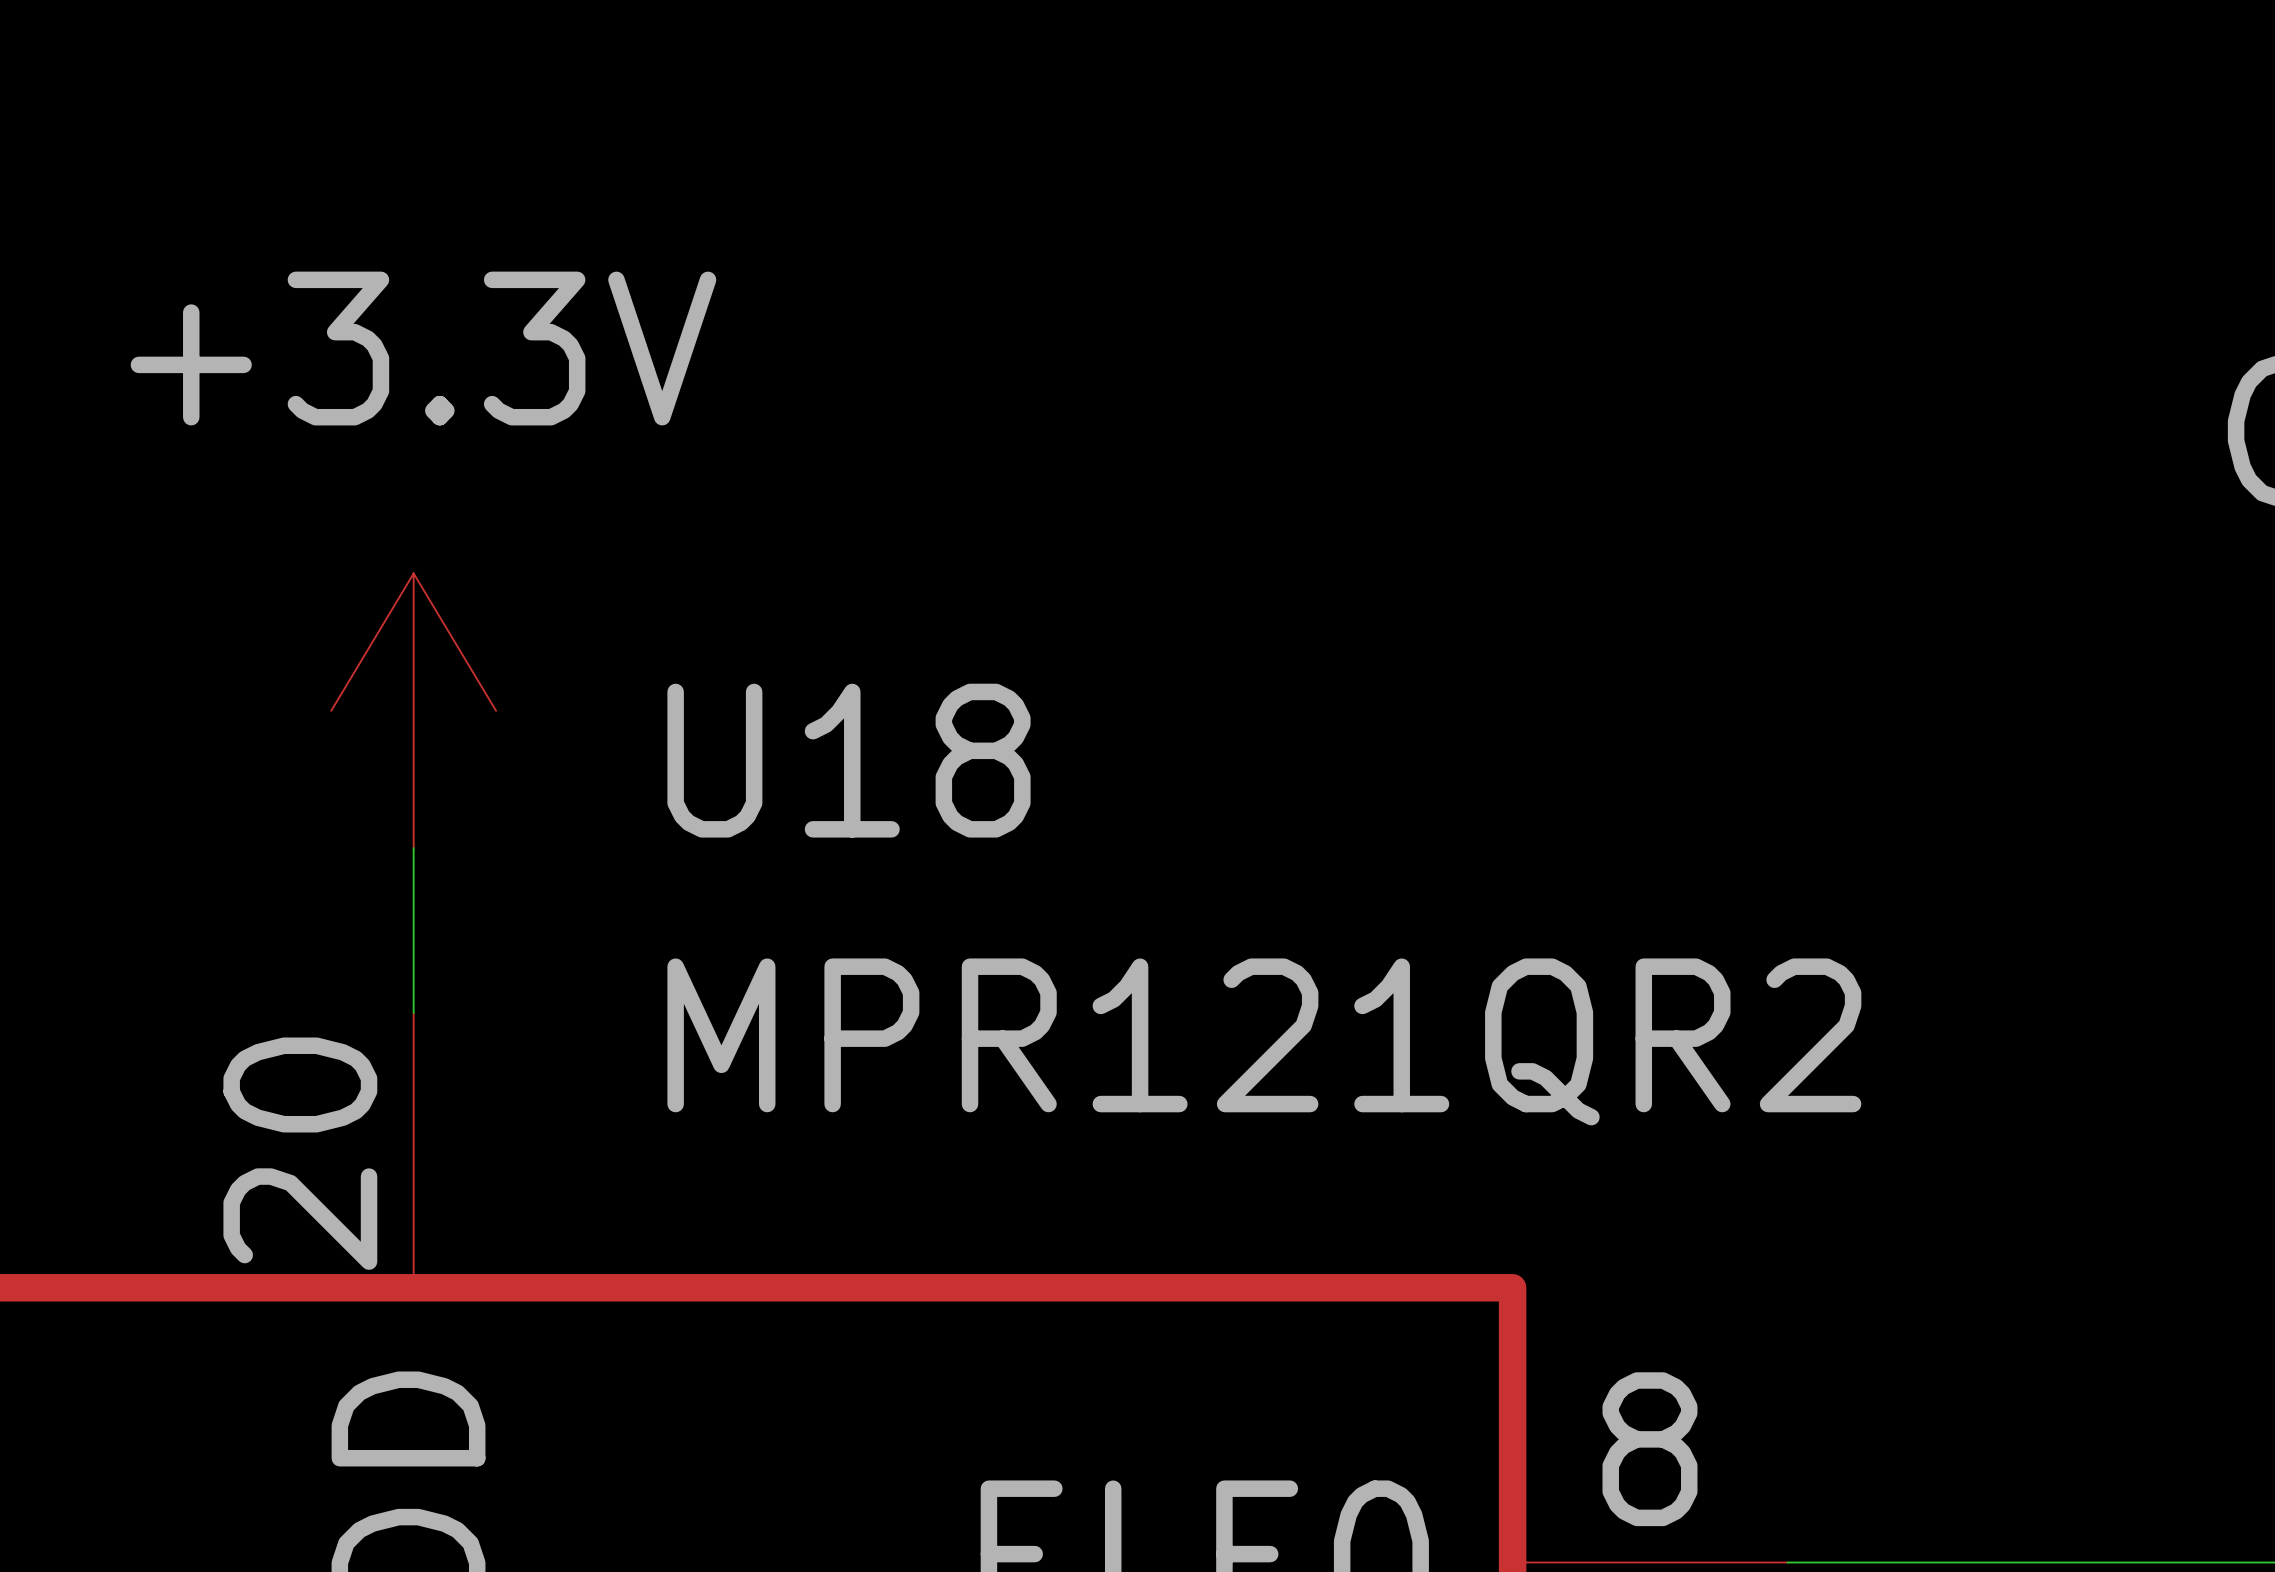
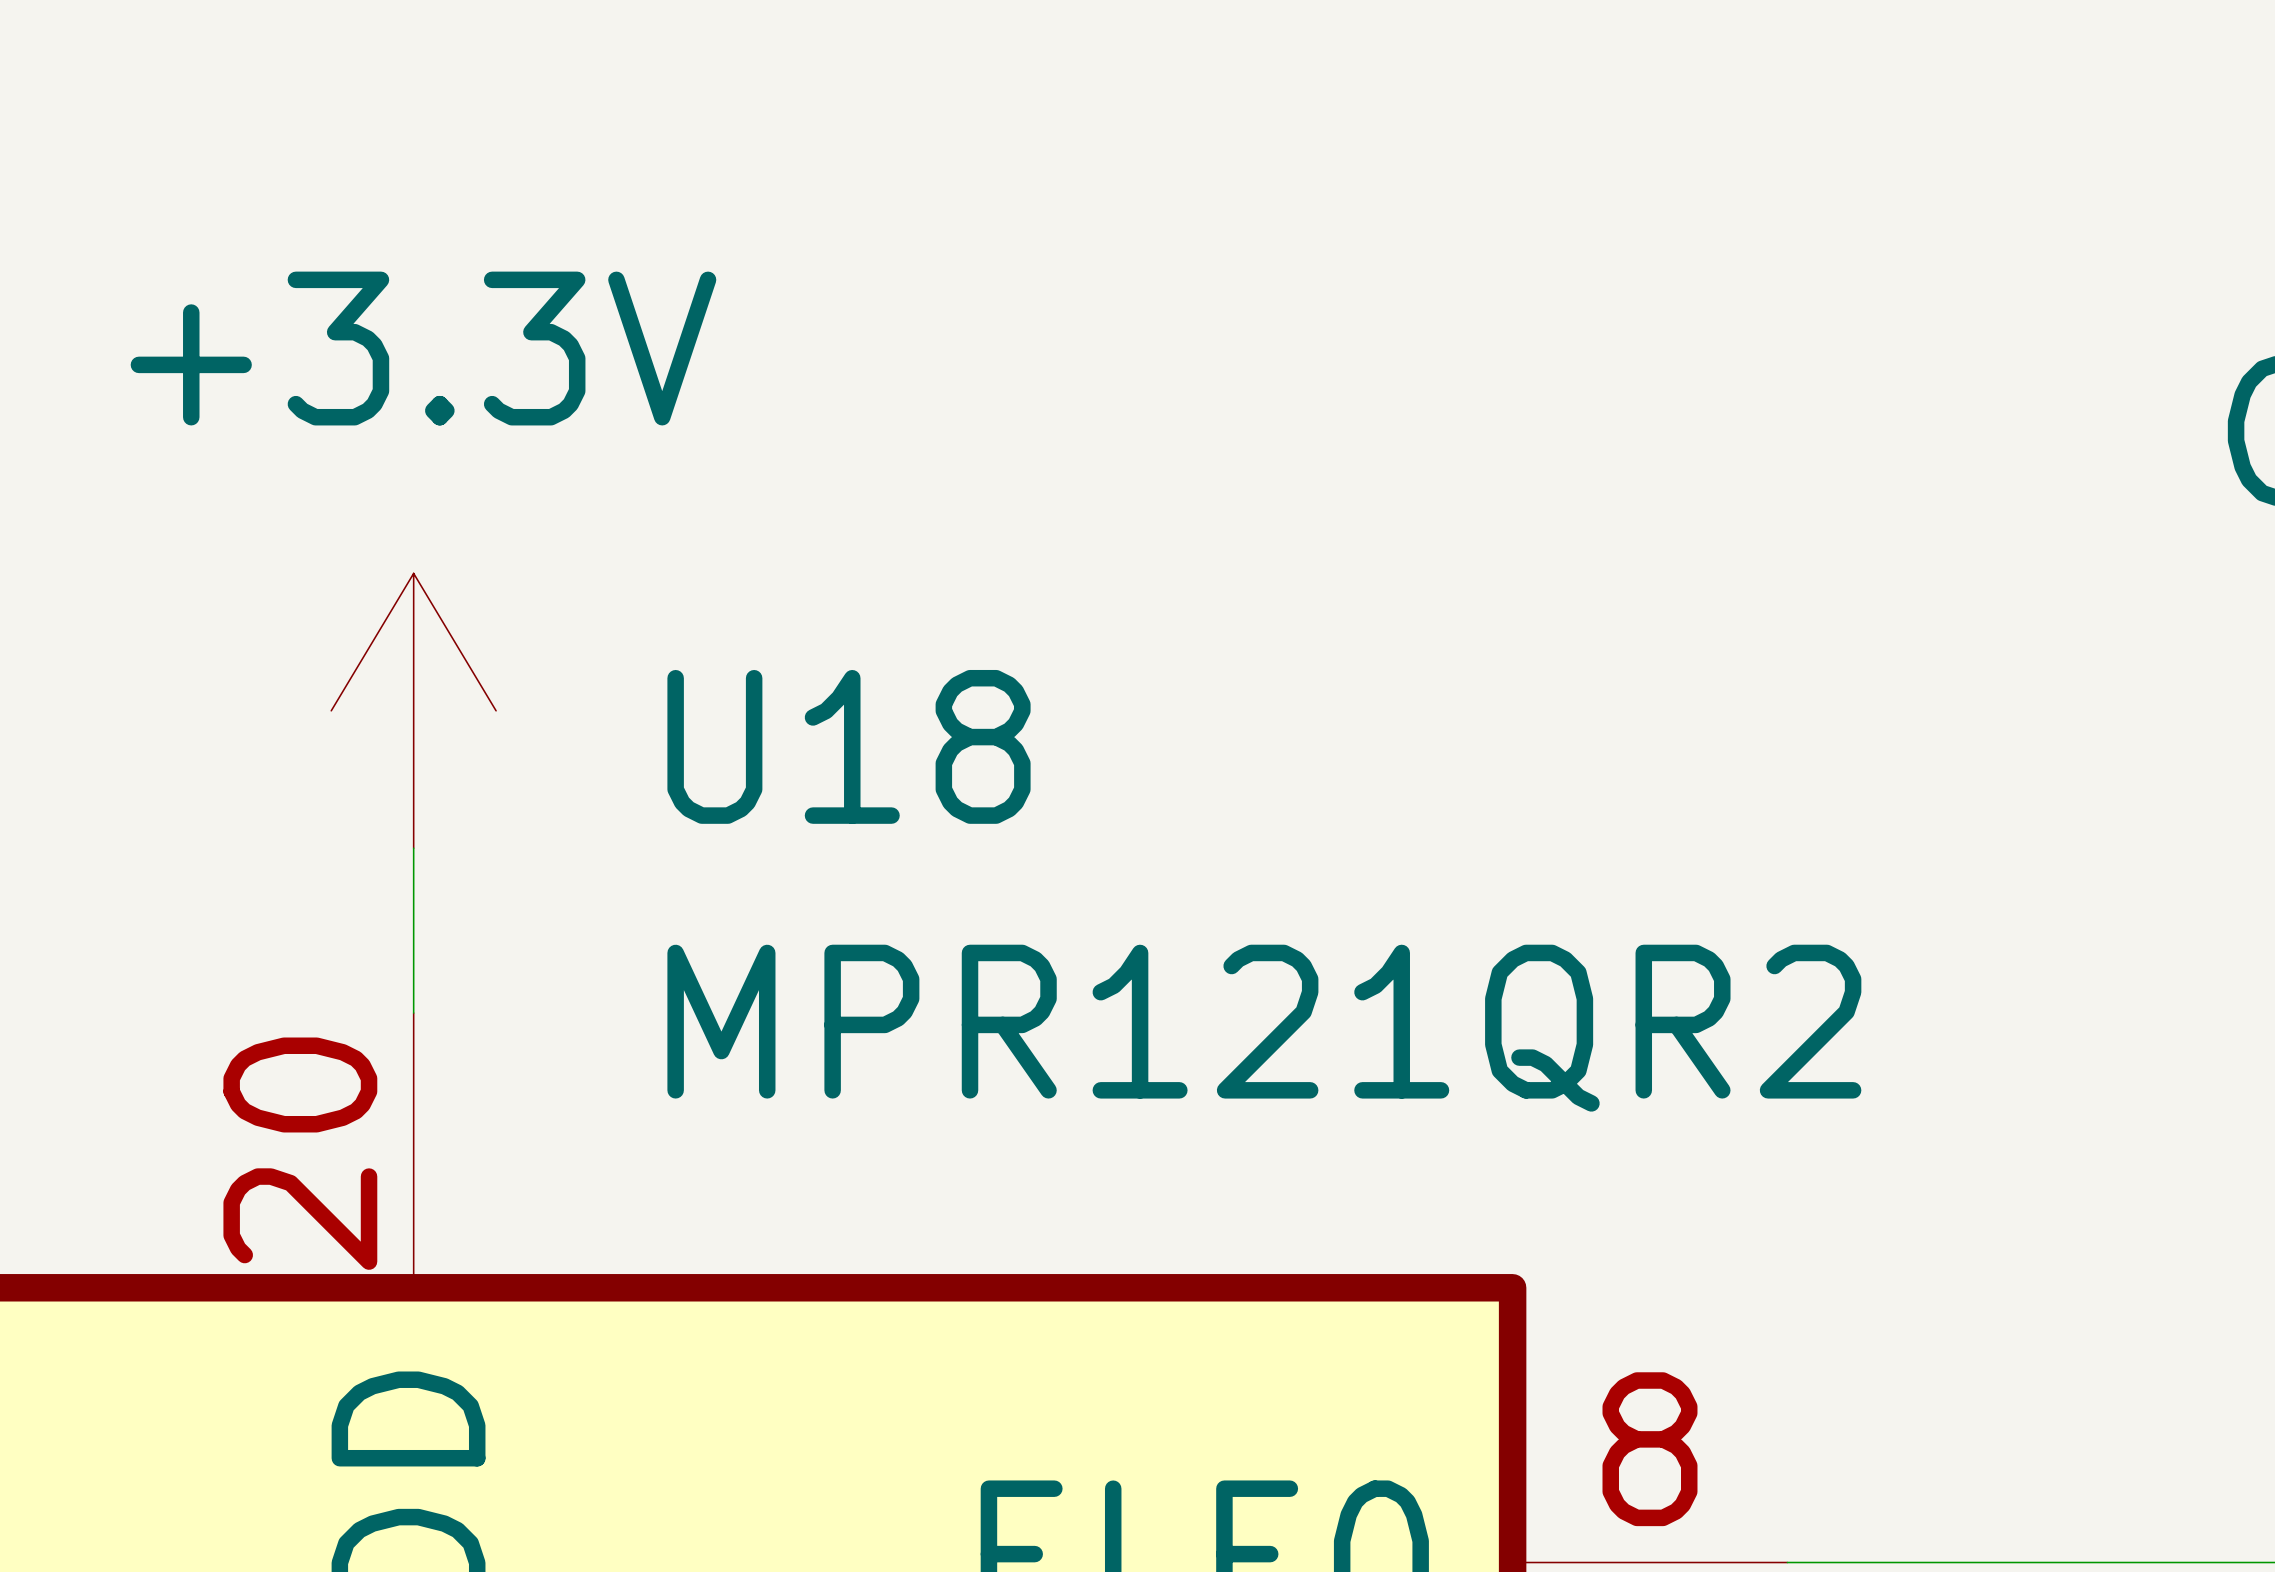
U18 name position: U18 (848, 760) -> U18 (848, 746)
U18 value position: MPR121QR2 (1264, 1041) -> MPR121QR2 (1264, 1028)

